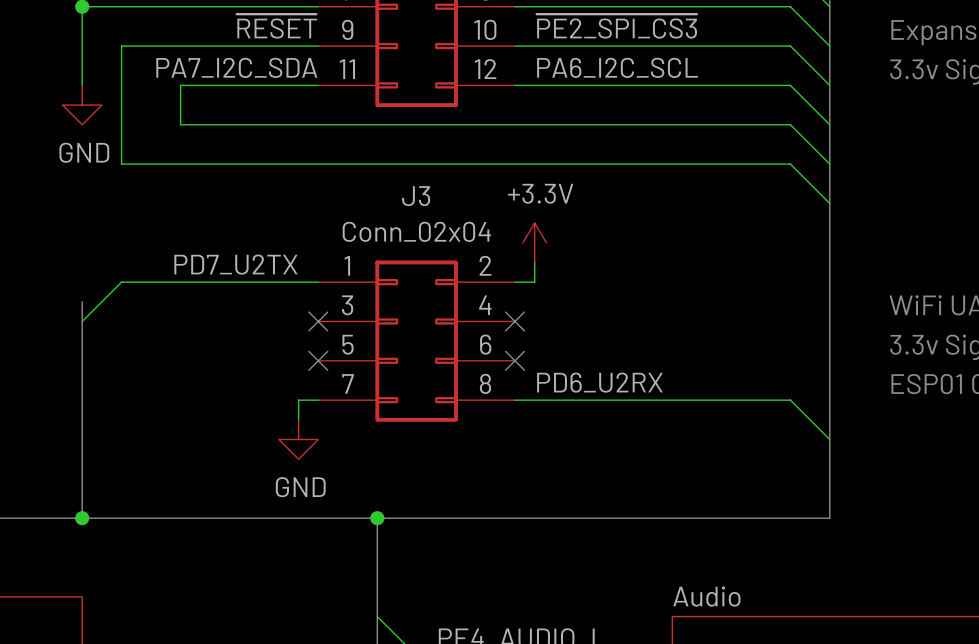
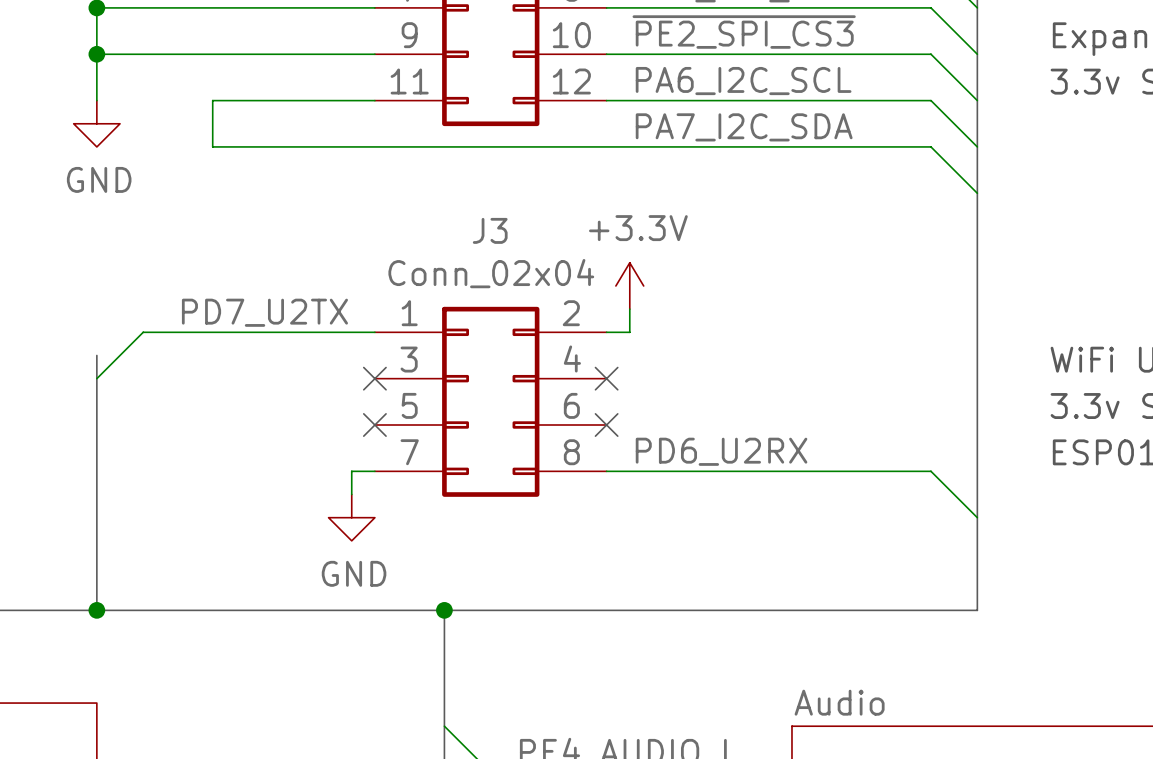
label: ~{RESET} (276, 26) -> none
junction: none -> (96, 54)
wire: (121, 46) (121, 164) (790, 164) (829, 203) -> (143, 54) (96, 54)
label position: PA7_I2C_SDA (236, 67) -> PA7_I2C_SDA (744, 127)

